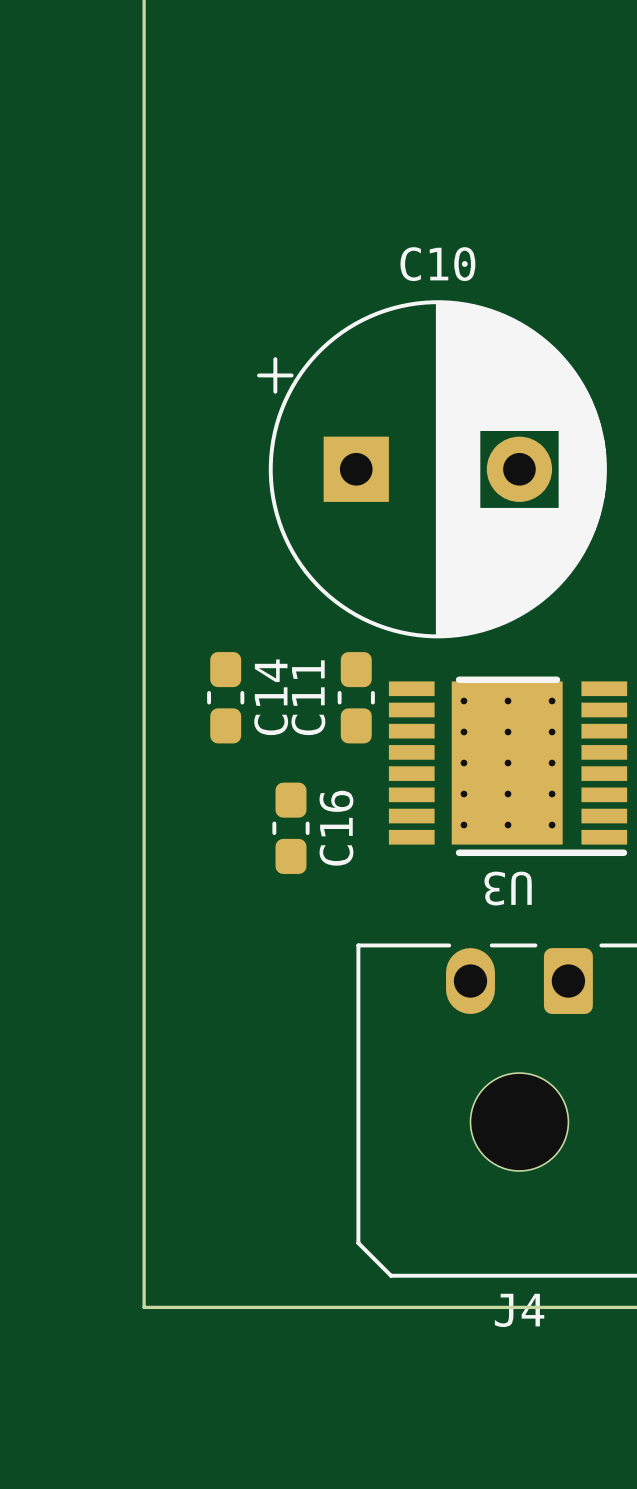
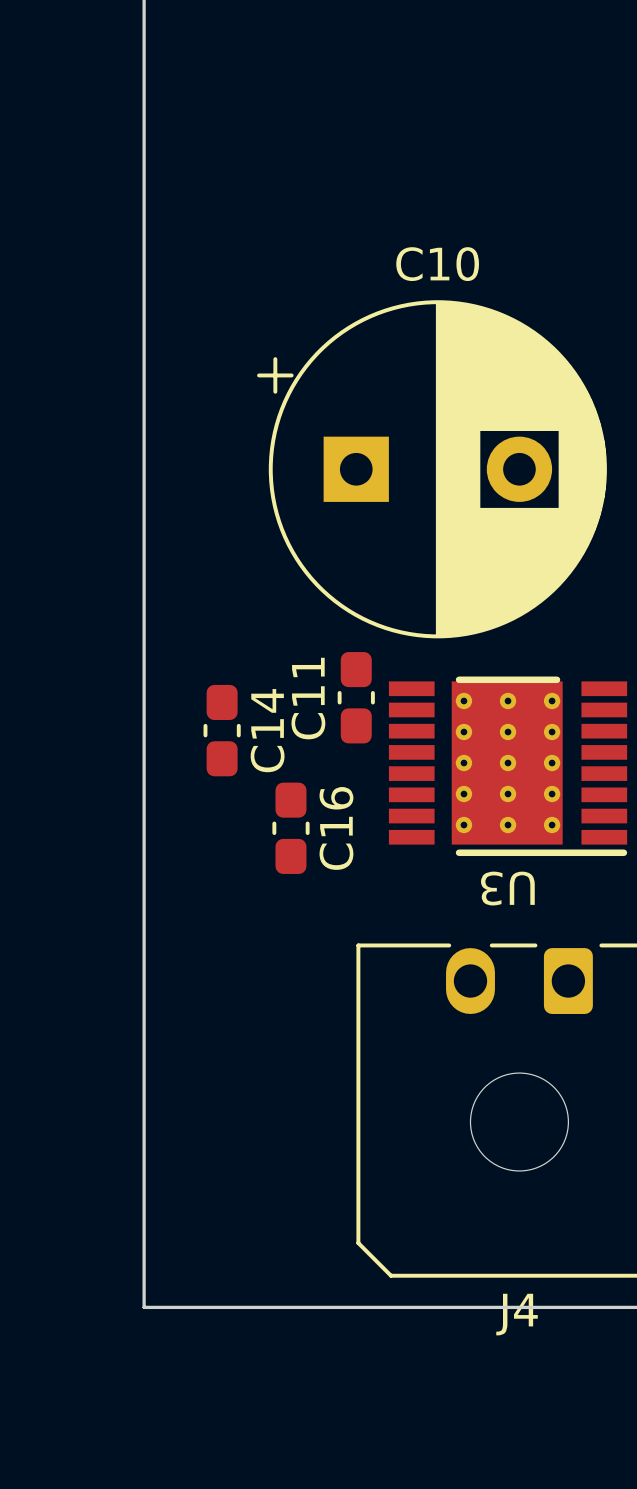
C14 position: (225, 697) -> (222, 730)

